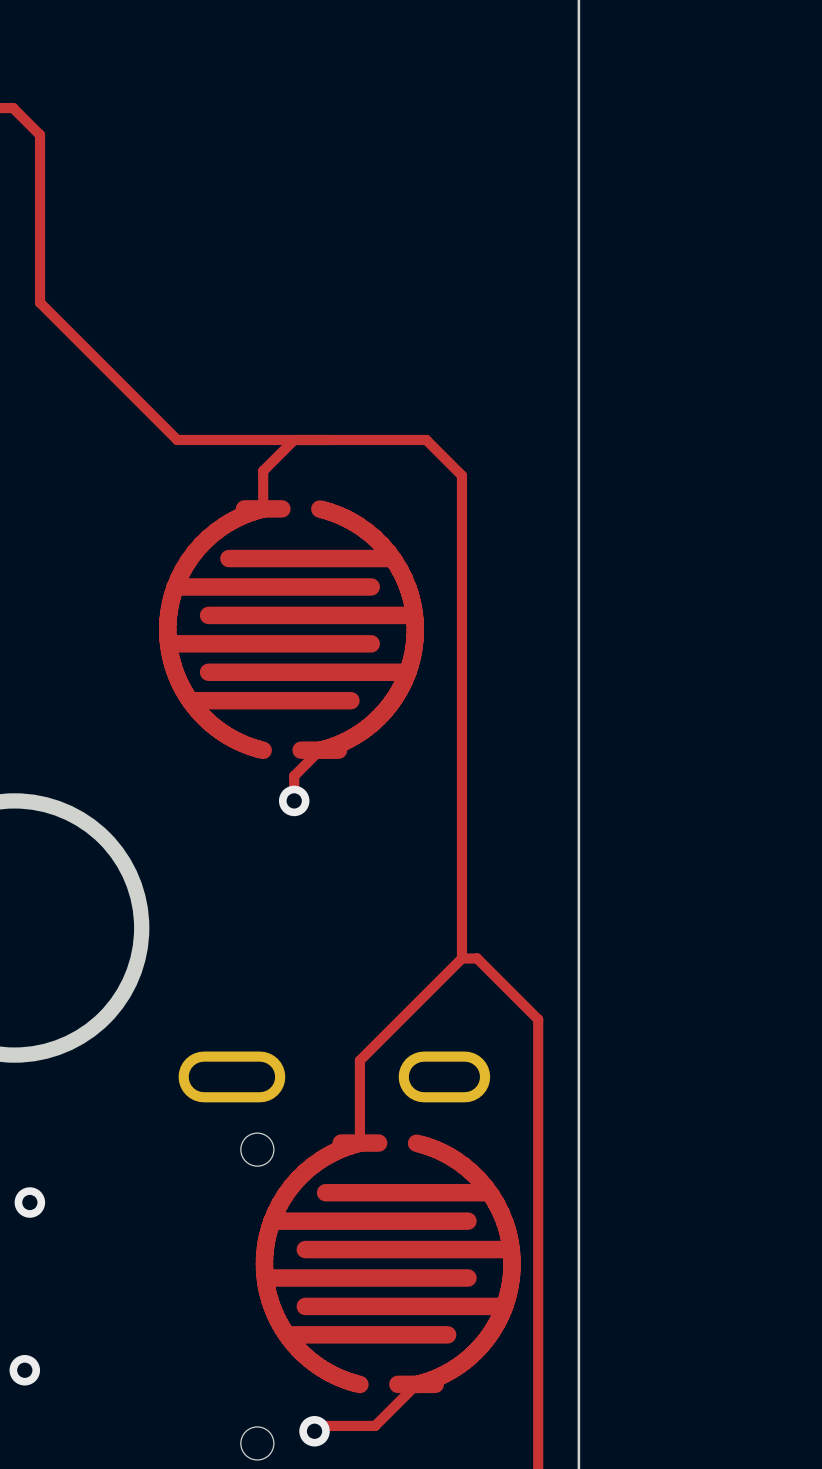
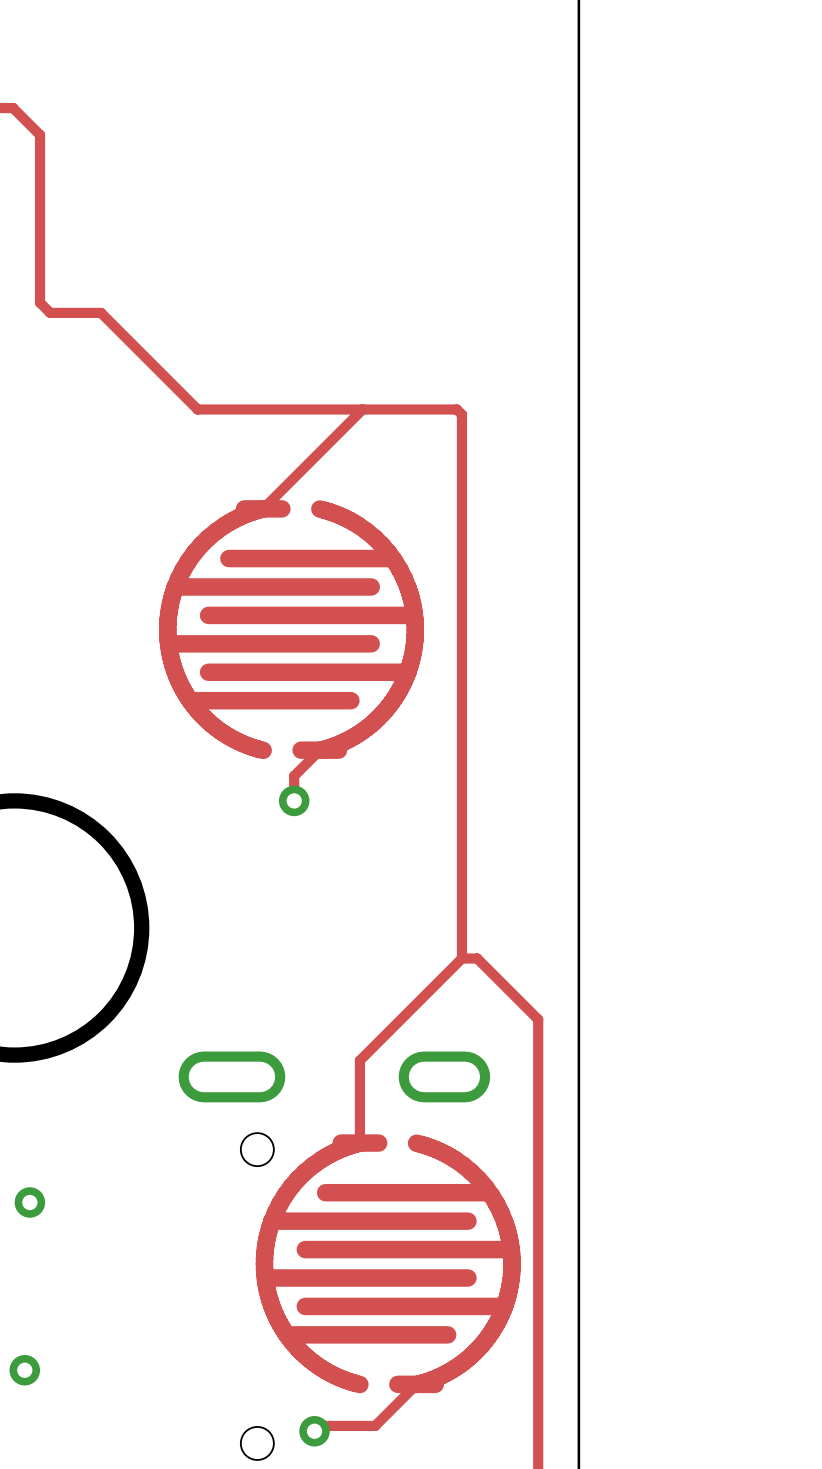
track: (50, 312) (177, 439) (426, 439) (461, 475) -> (50, 312) (101, 312) (197, 409) (456, 409) (461, 414) (461, 475)
track: (294, 439) (263, 471) (263, 508) -> (362, 409) (263, 508)

